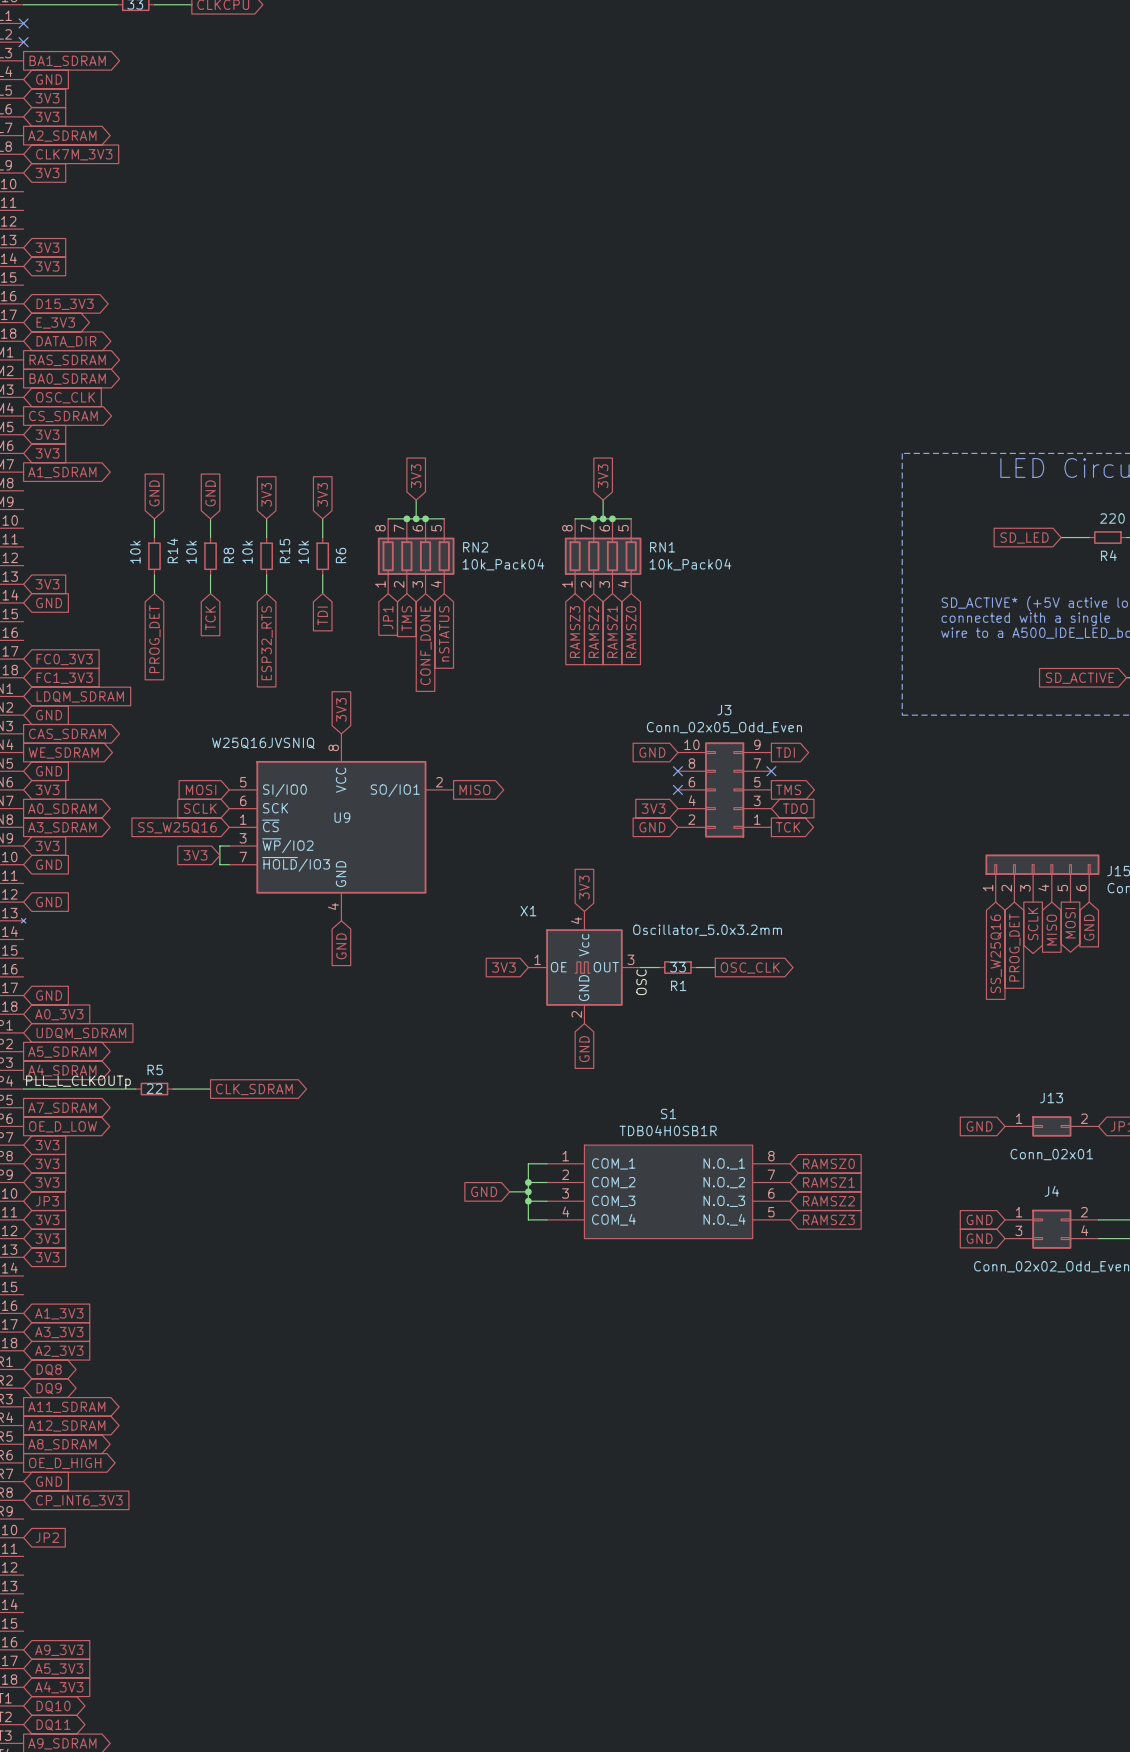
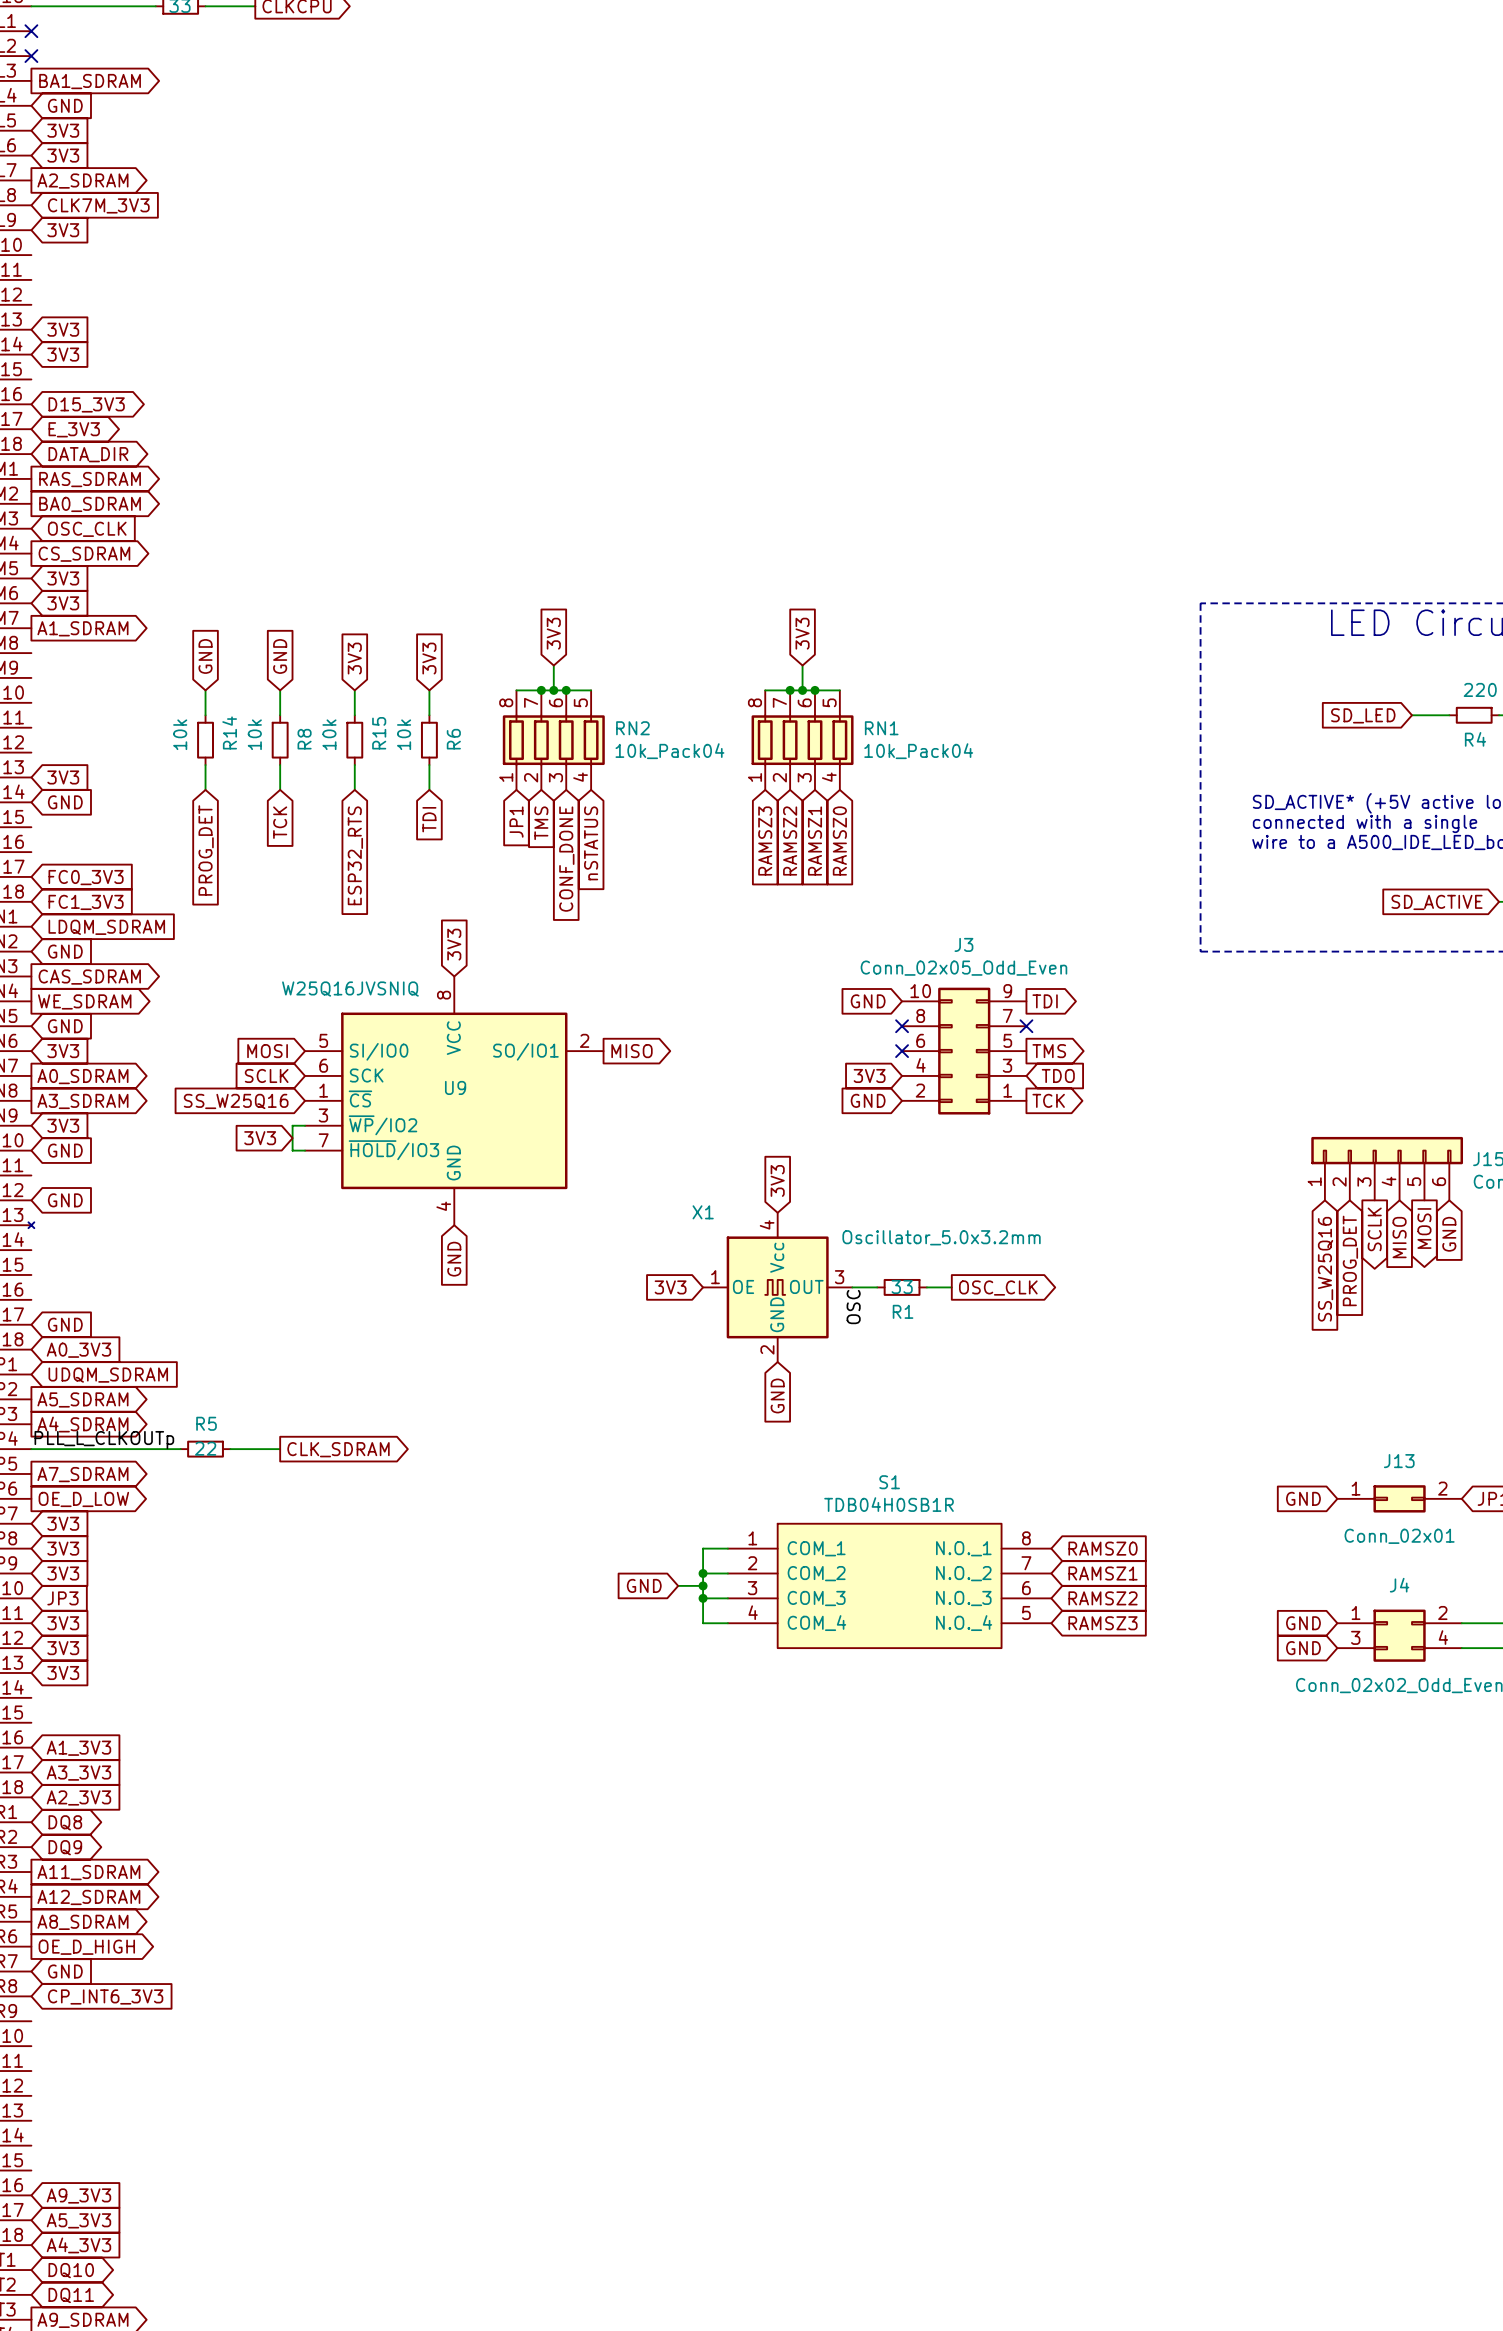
global label: JP2 (47, 1537) -> none

